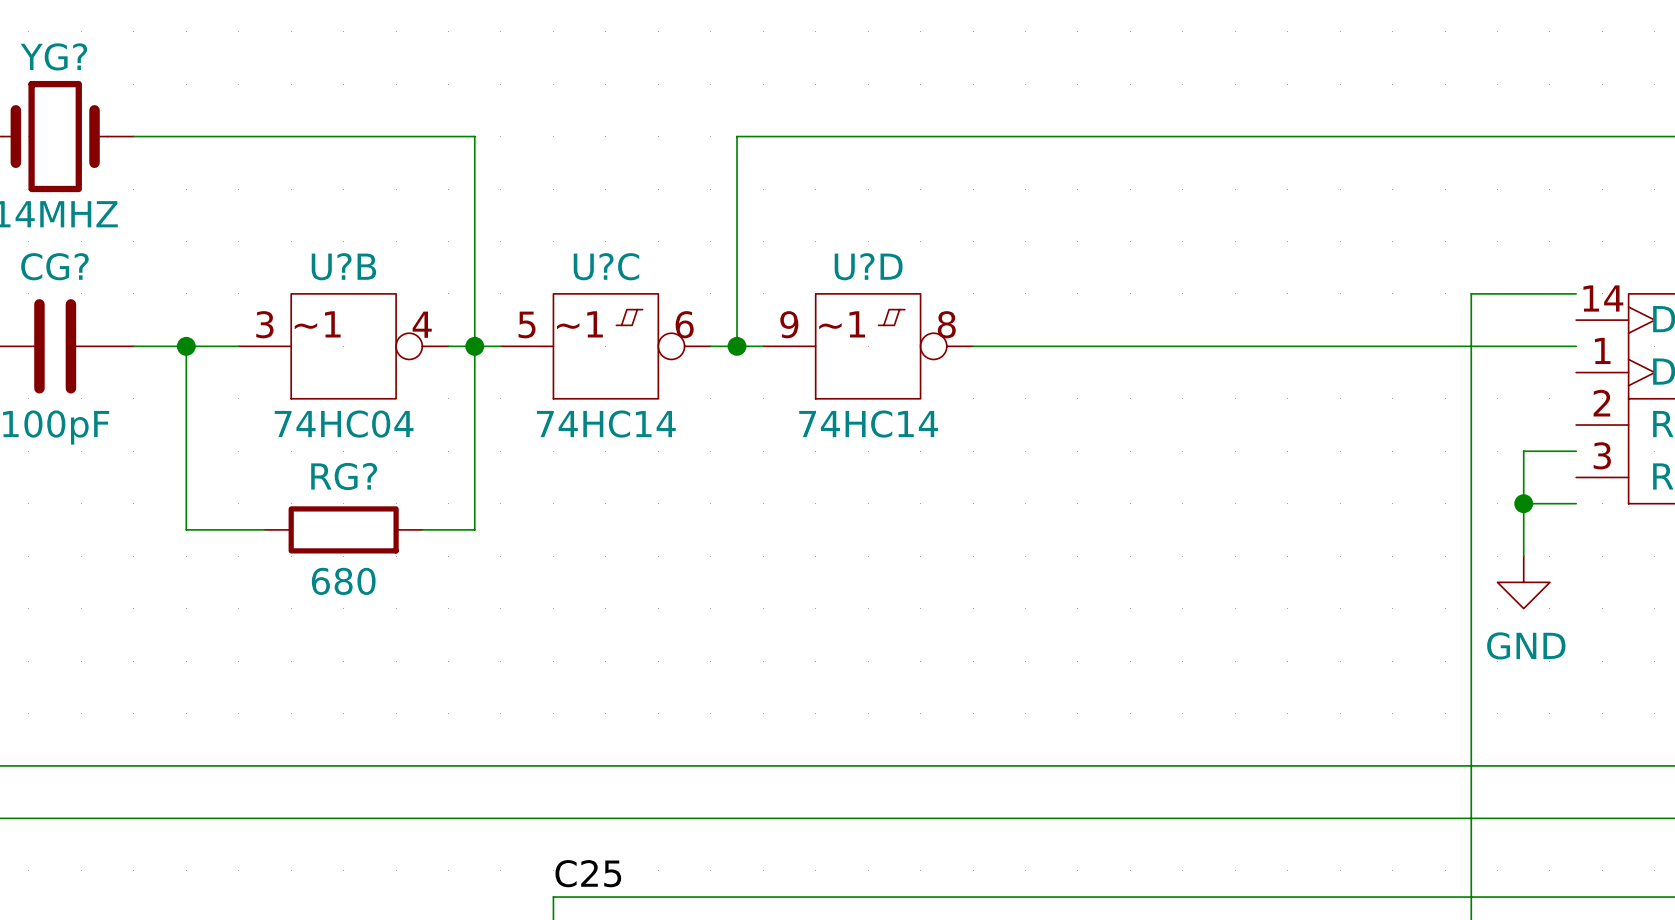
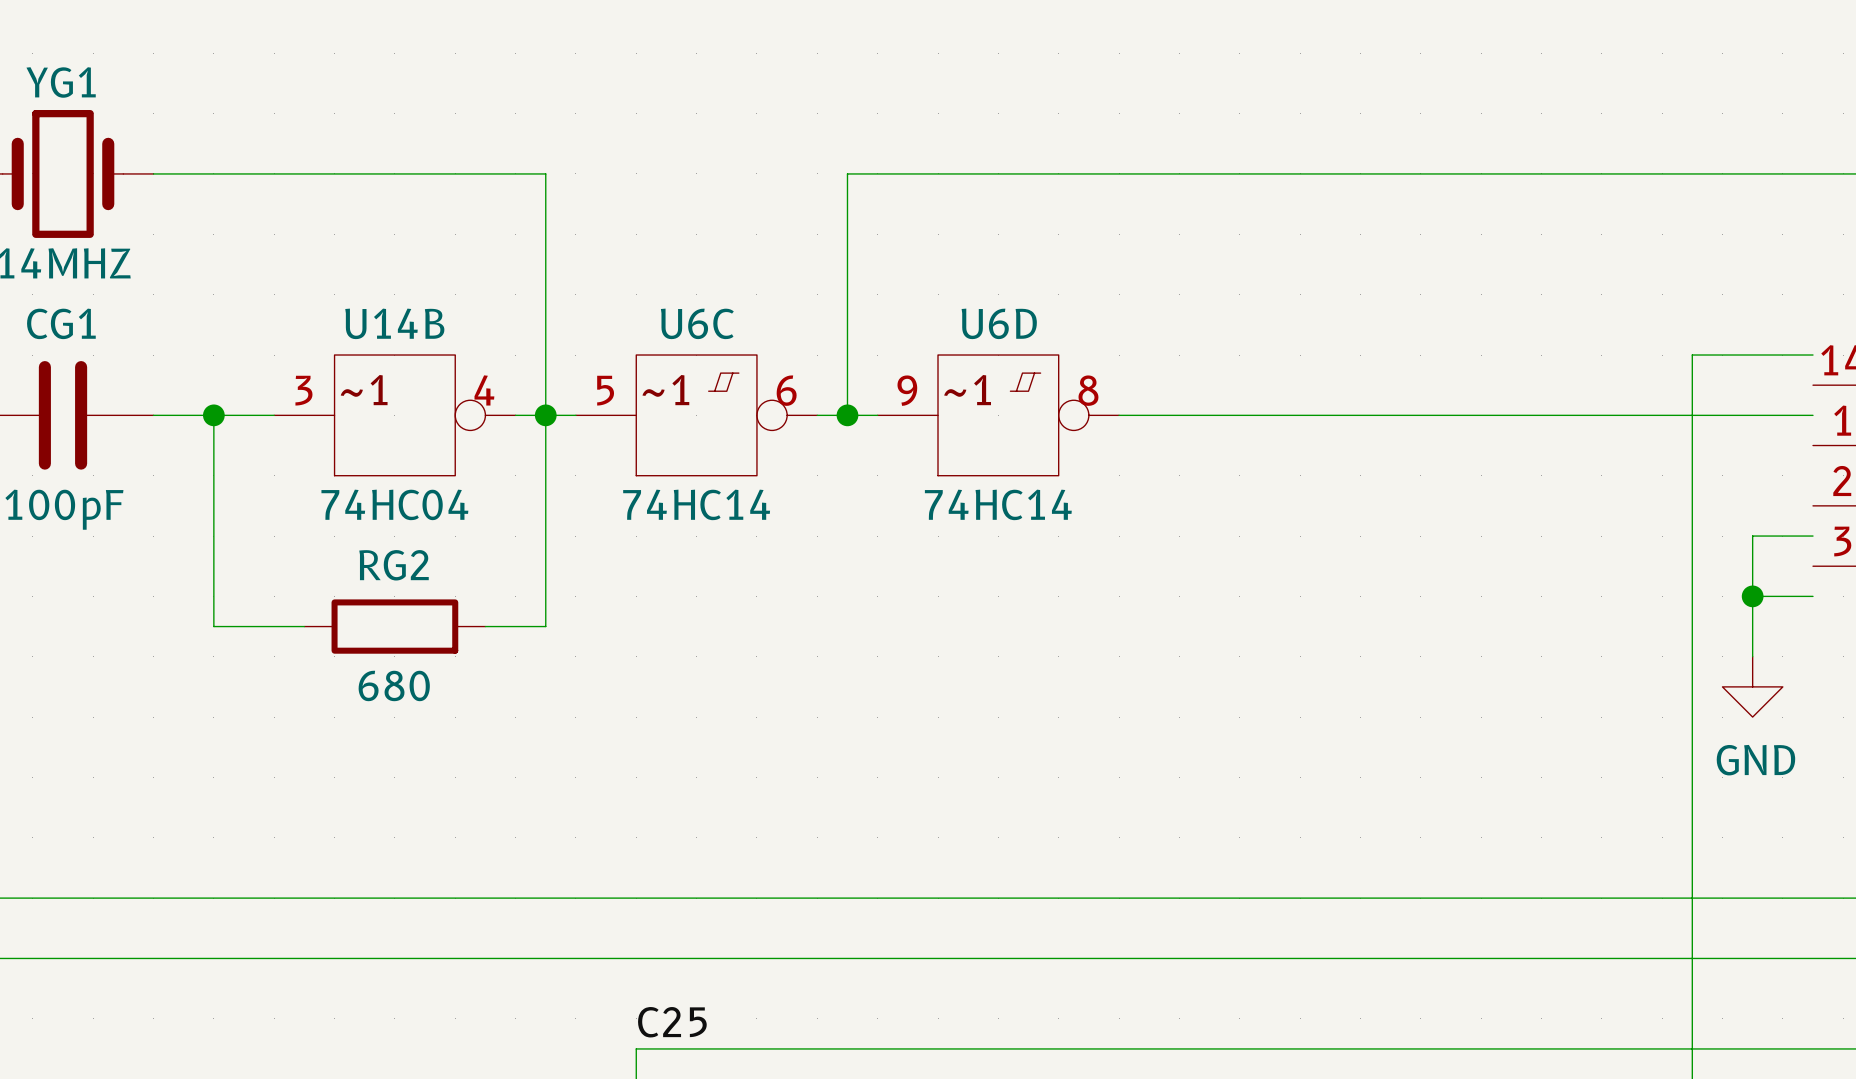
YG? name: YG? (53, 56) -> YG1 (61, 82)
CG? name: CG? (54, 266) -> CG1 (61, 323)
U?B name: U?B (343, 266) -> U14B (394, 323)
U?C name: U?C (606, 266) -> U6C (697, 323)
U?D name: U?D (868, 266) -> U6D (999, 323)
RG? name: RG? (344, 476) -> RG2 (394, 565)

